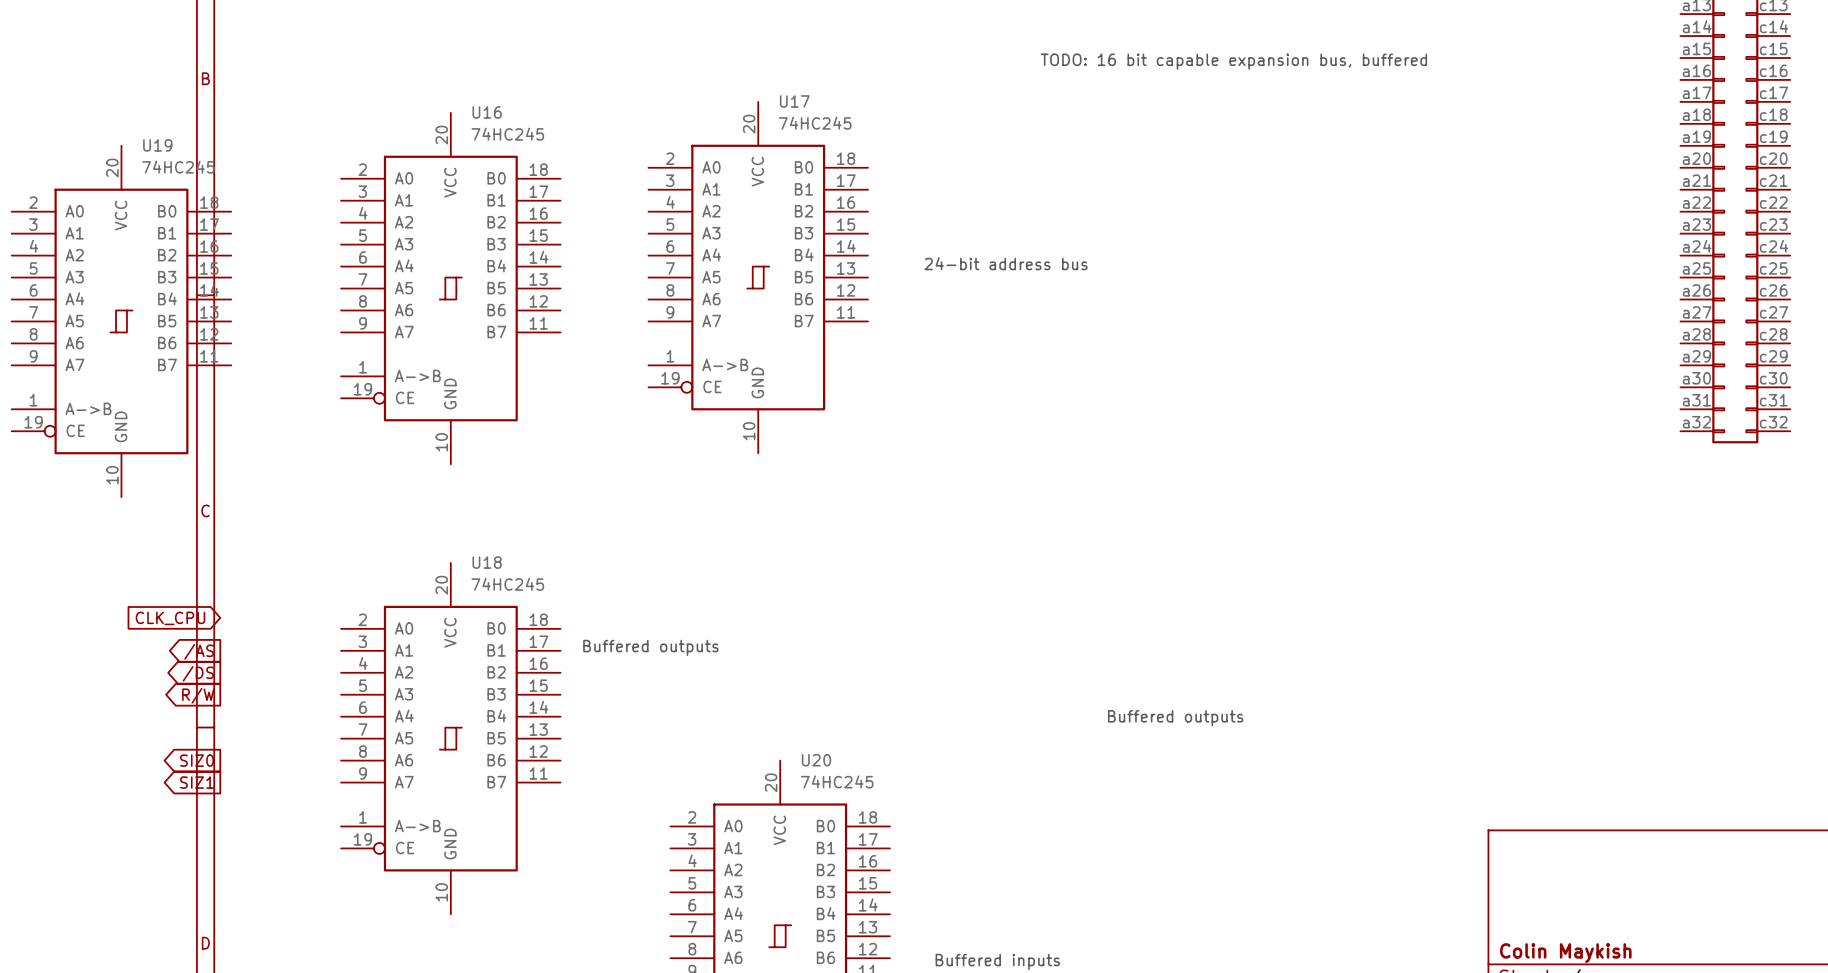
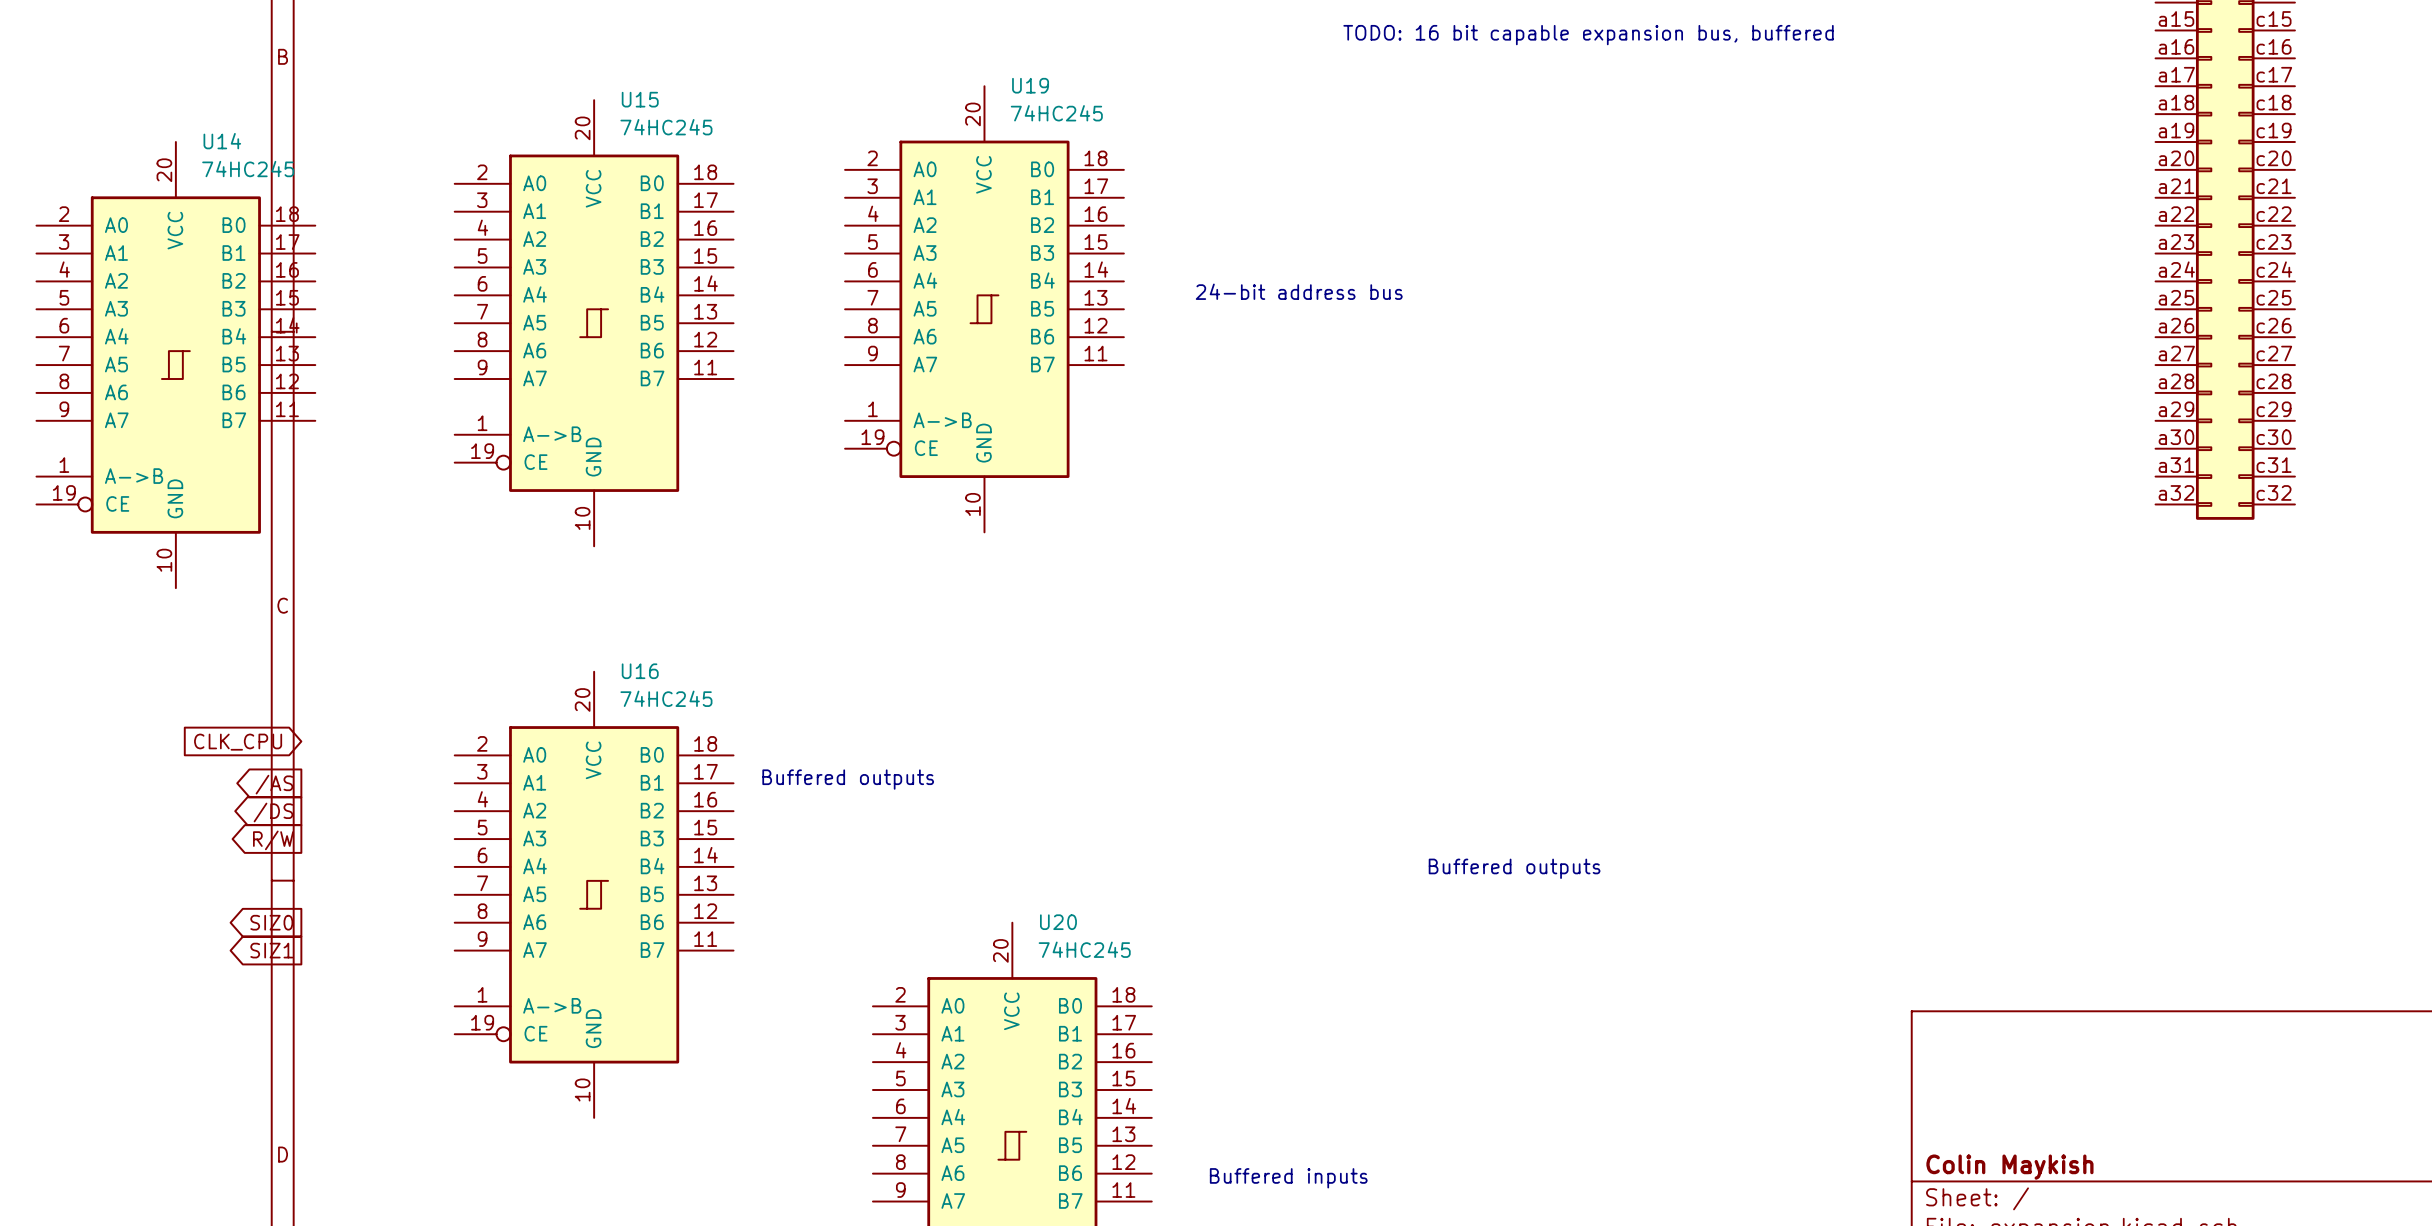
U17 name: U17 (794, 101) -> U19 (1030, 85)
U16 name: U16 (487, 112) -> U15 (640, 99)
U19 name: U19 (157, 145) -> U14 (222, 141)
U18 name: U18 (487, 562) -> U16 (640, 671)

